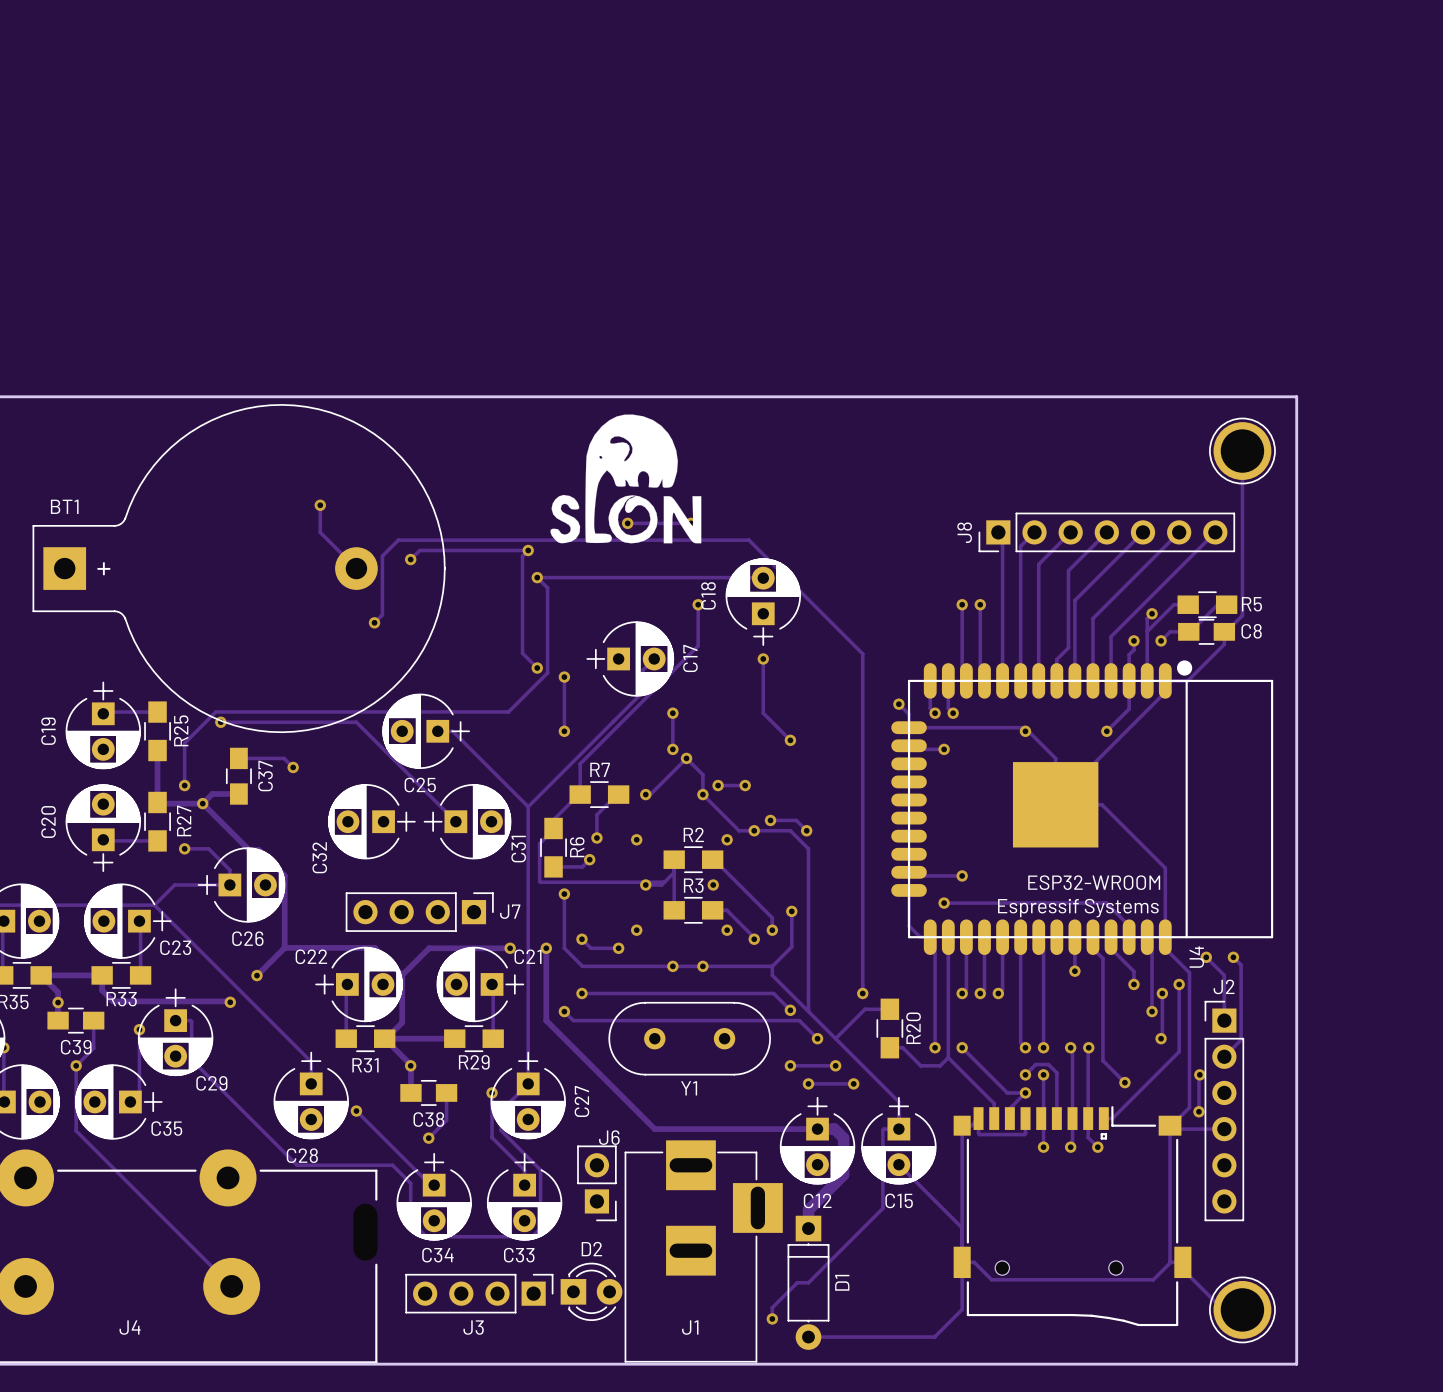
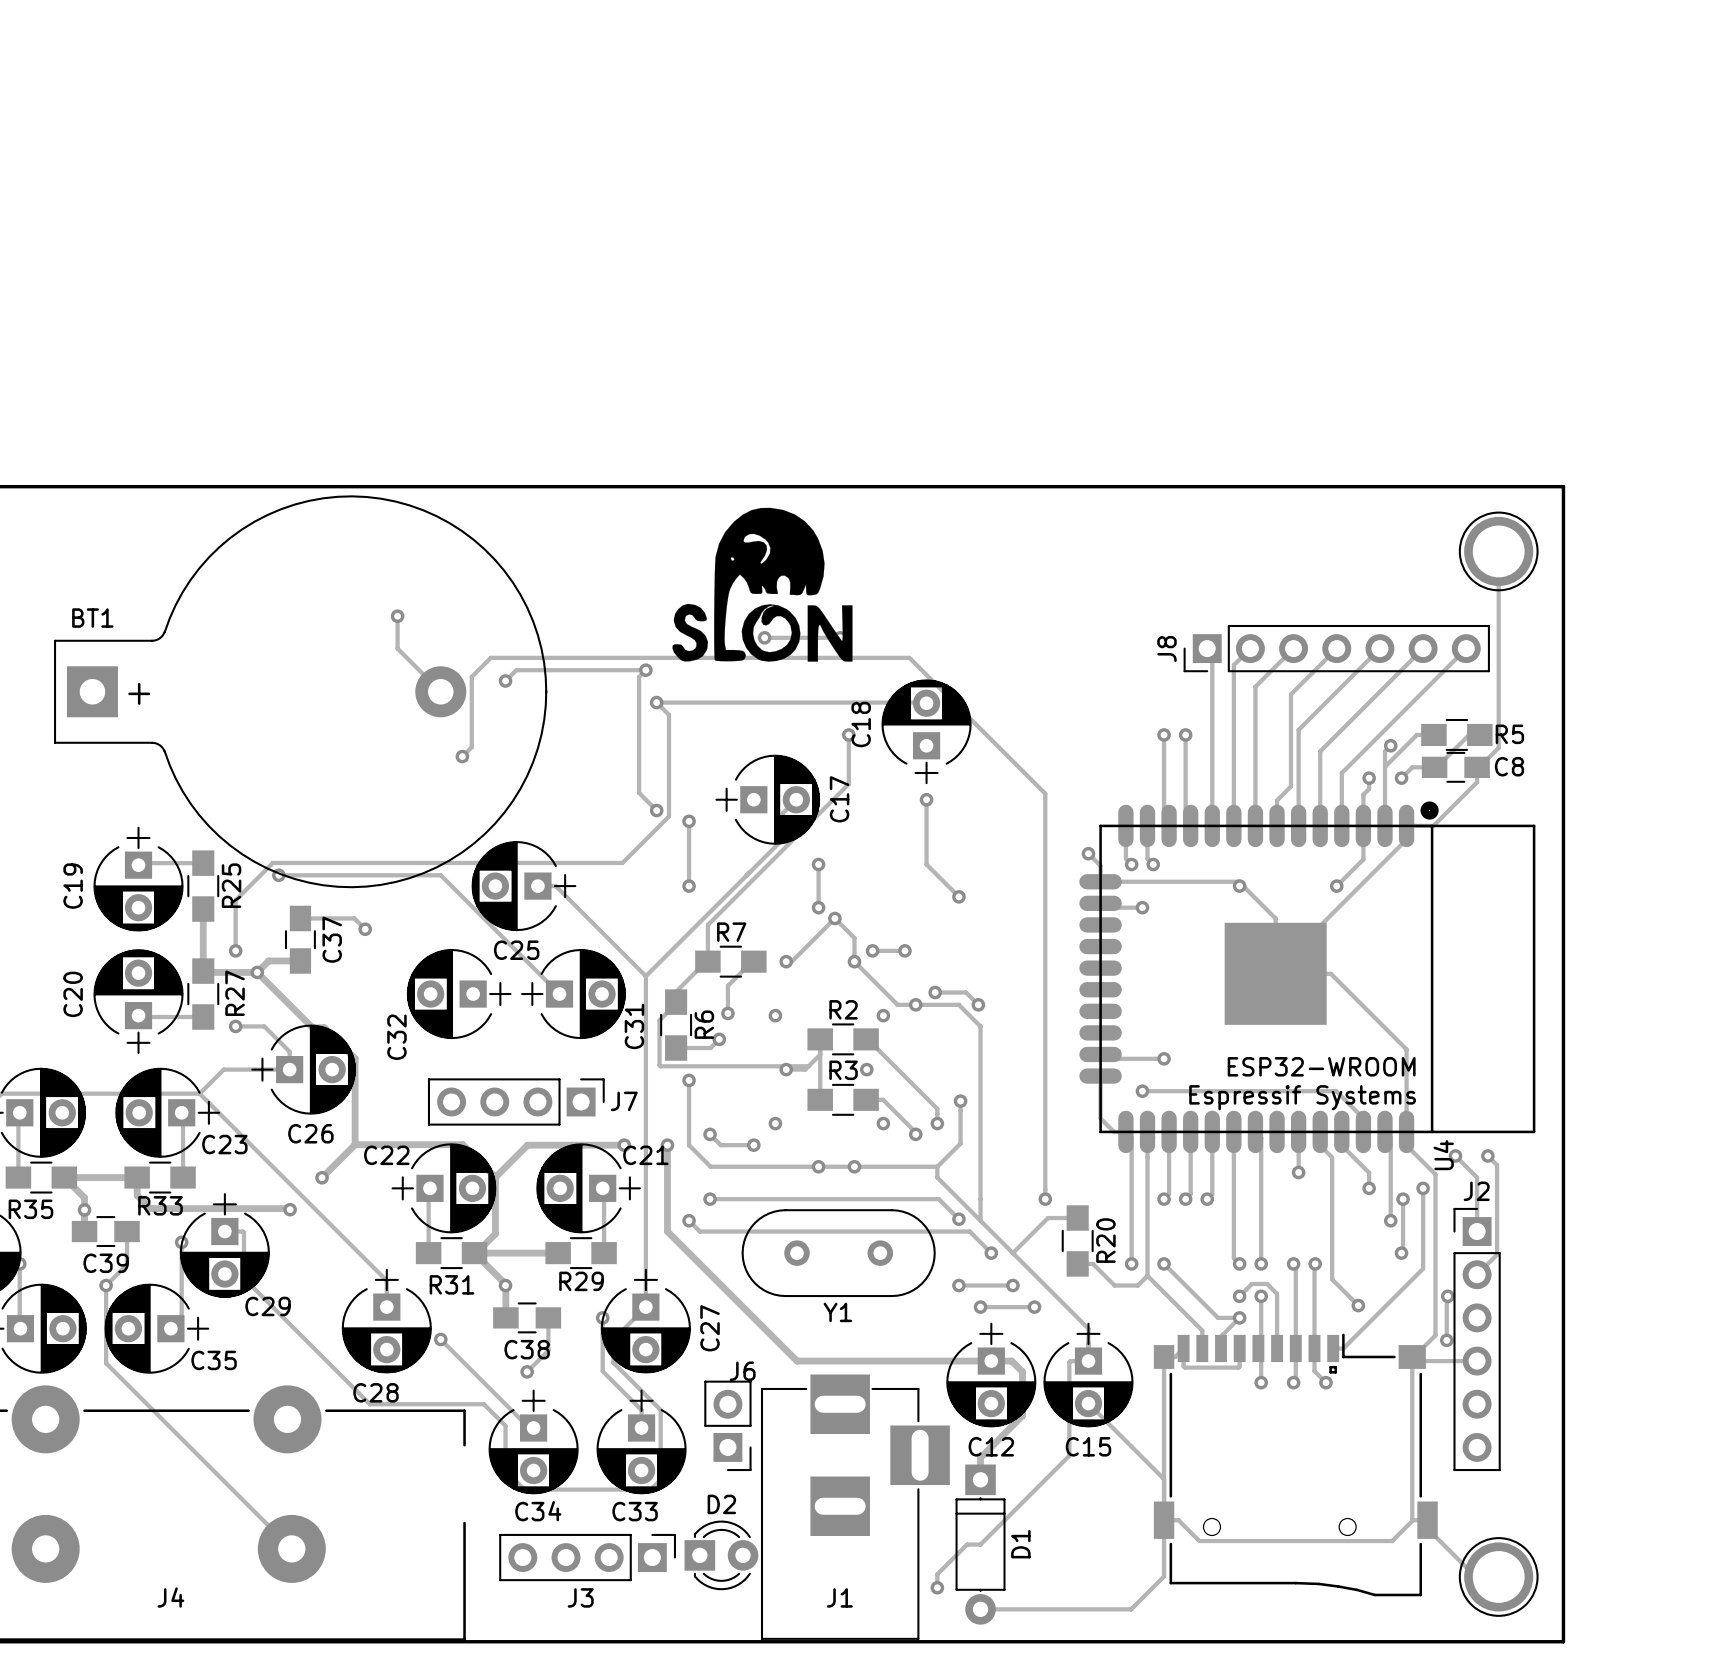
track width: thick (817, 1129) (834, 1129) (843, 1138) (843, 1174) (808, 1210) (808, 1228) -> thin (991, 1361) (1011, 1361) (1022, 1371) (1022, 1415) (980, 1457) (980, 1479)

